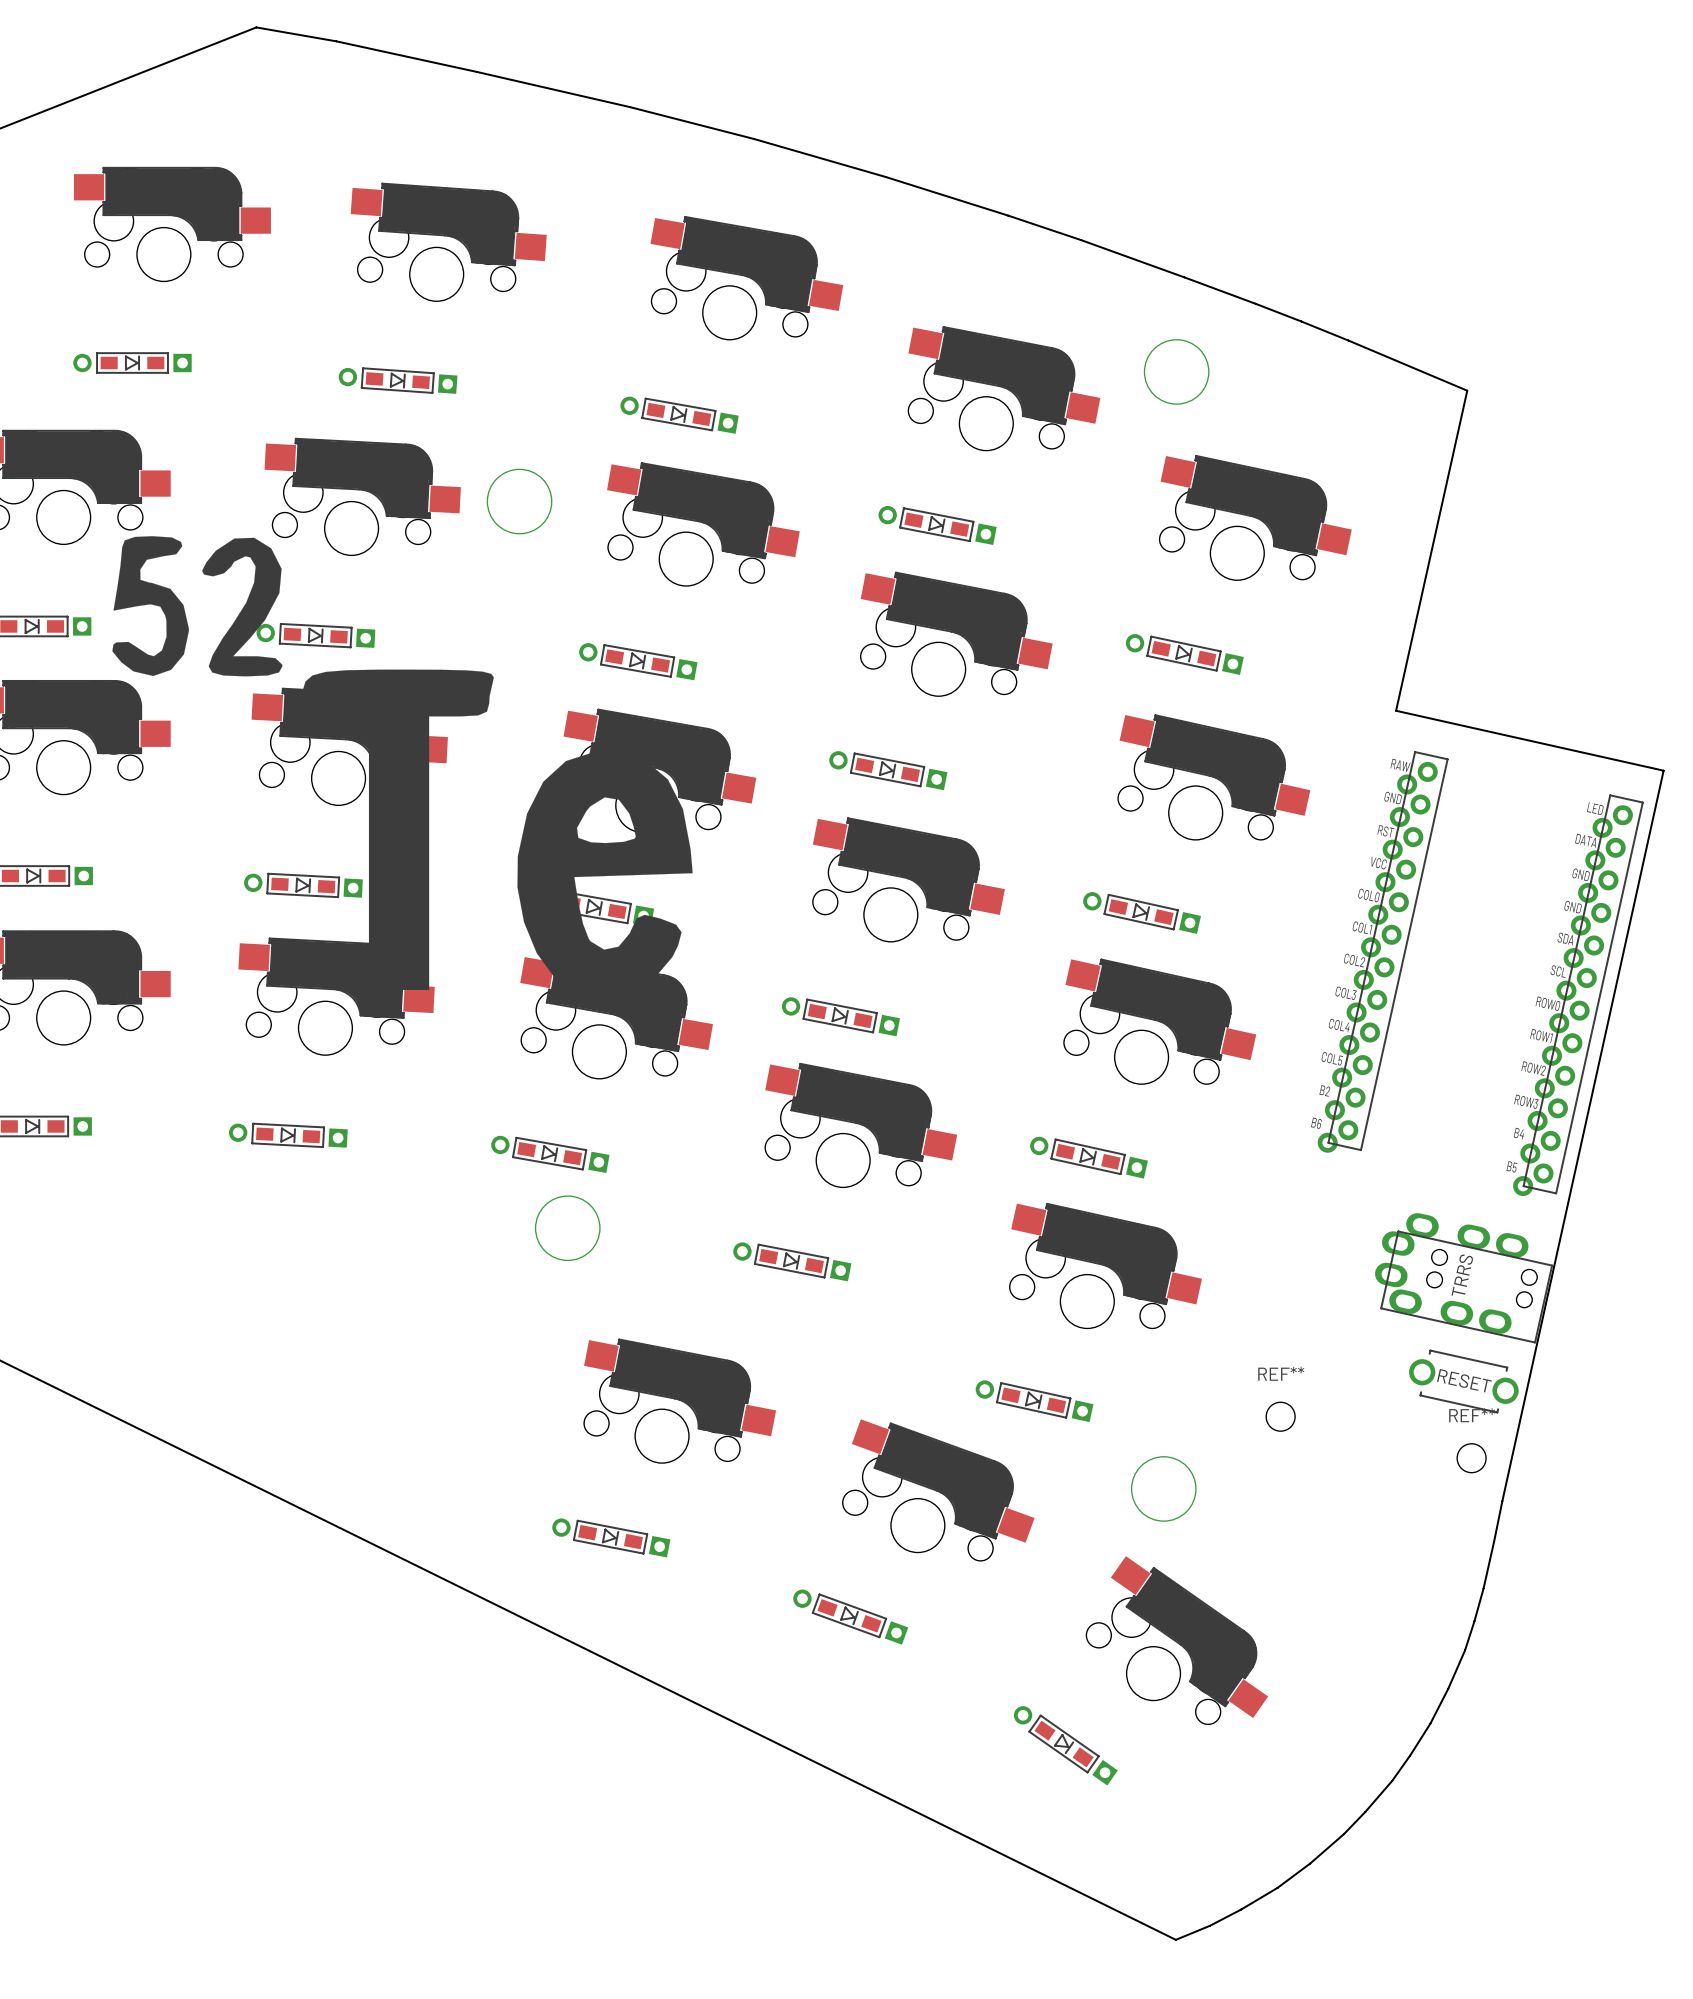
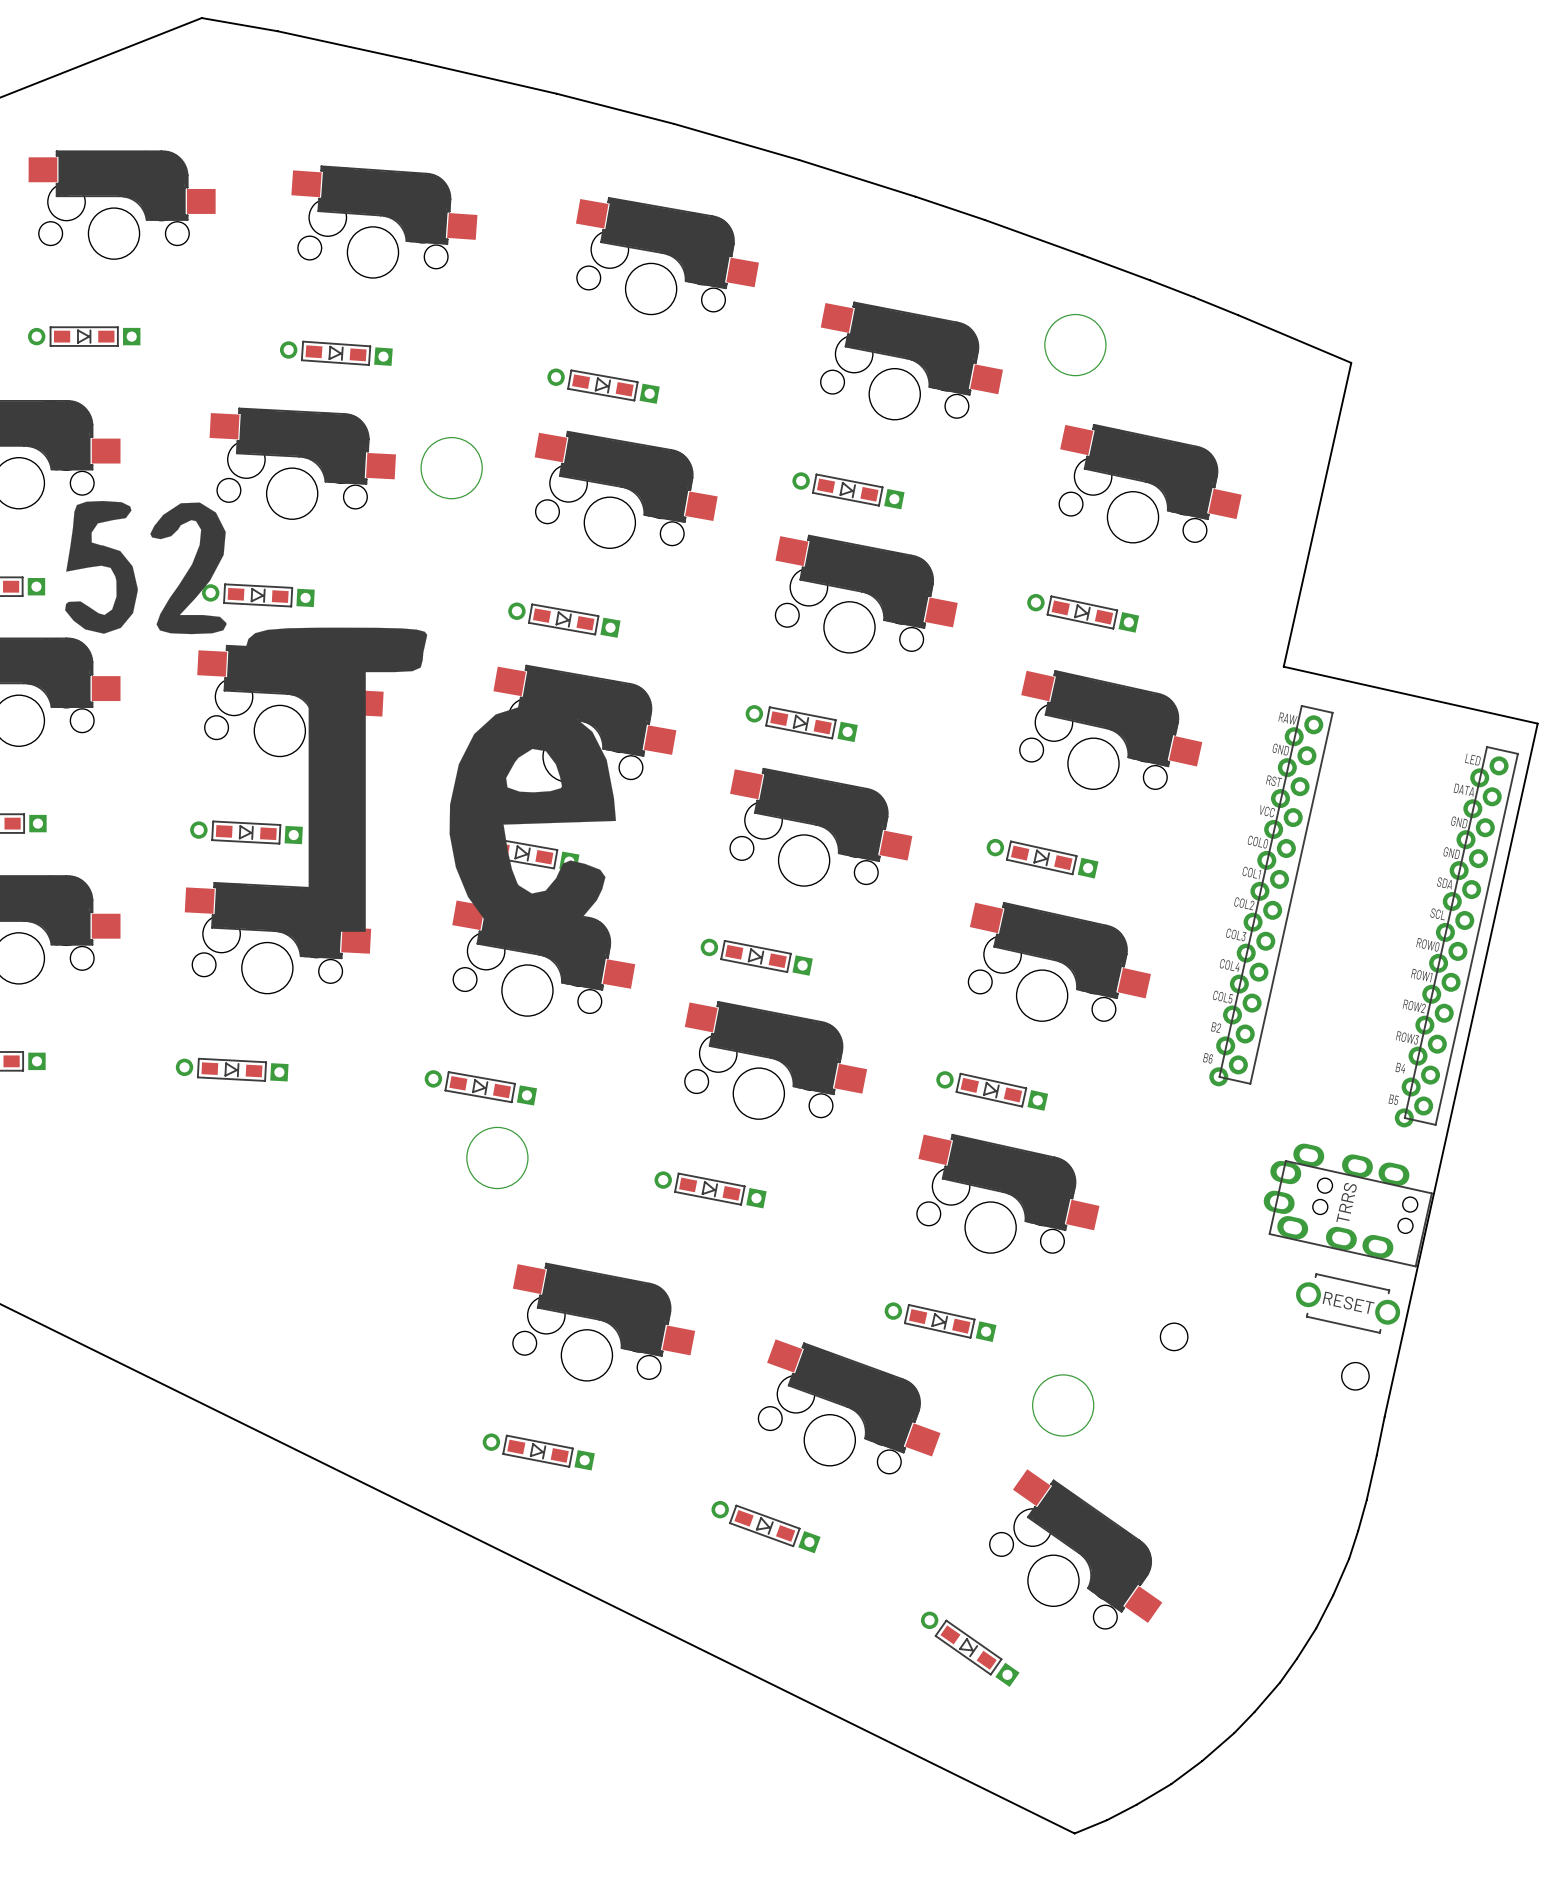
REF** name: REF** (1281, 1373) -> none
REF** name: REF** (1472, 1415) -> none

